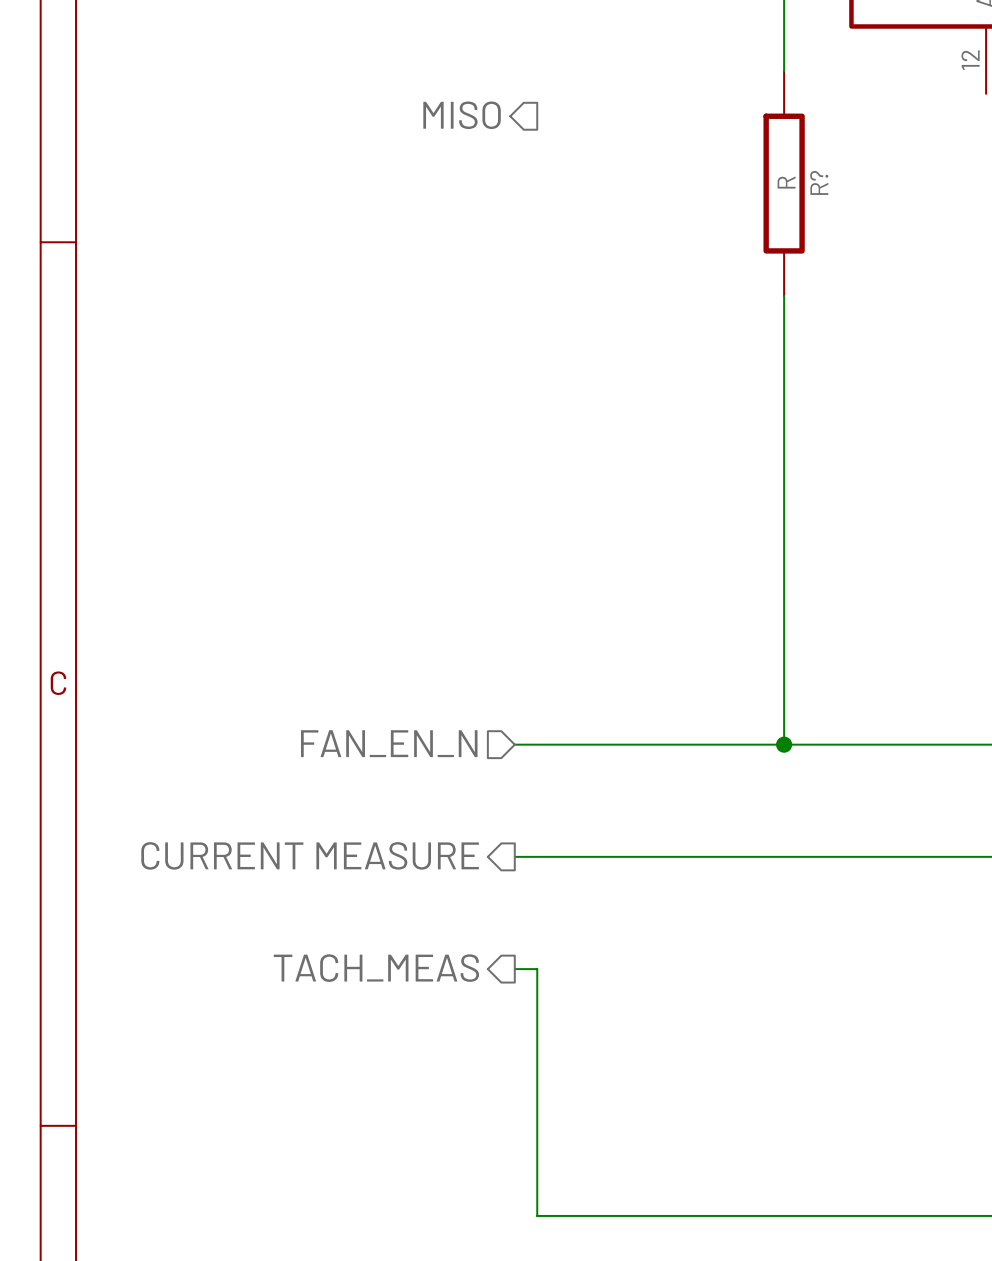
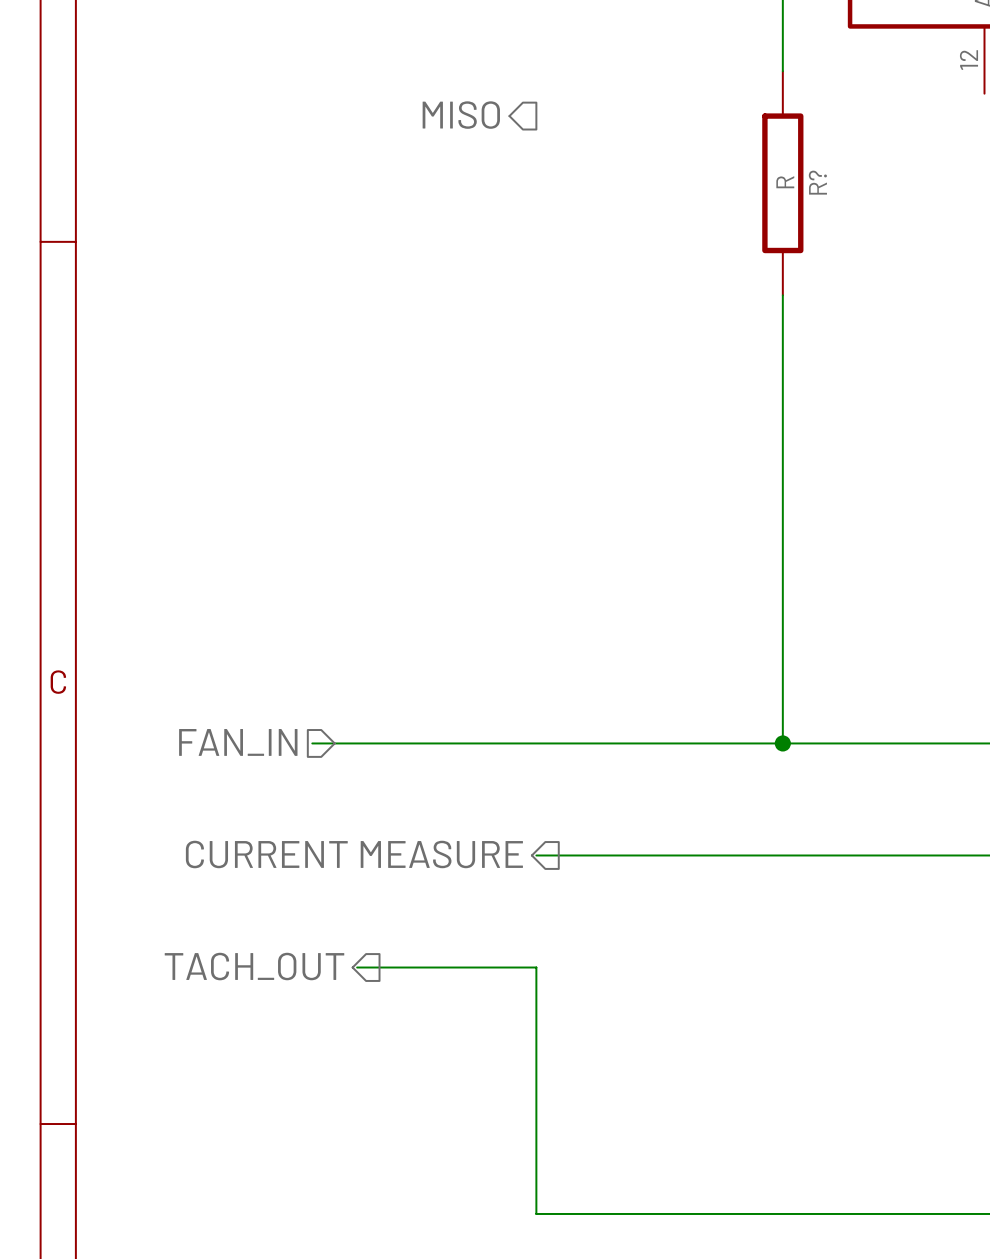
hierarchical label: FAN_EN_N (389, 743) -> FAN_IN (238, 742)
wire: none -> (312, 743) (513, 743)
hierarchical label position: CURRENT MEASURE (310, 855) -> CURRENT MEASURE (354, 854)
wire: (514, 856) (537, 856) -> none
hierarchical label: none -> TACH_OUT (254, 966)
hierarchical label: TACH_MEAS (376, 968) -> none
wire: none -> (357, 967) (513, 967)

